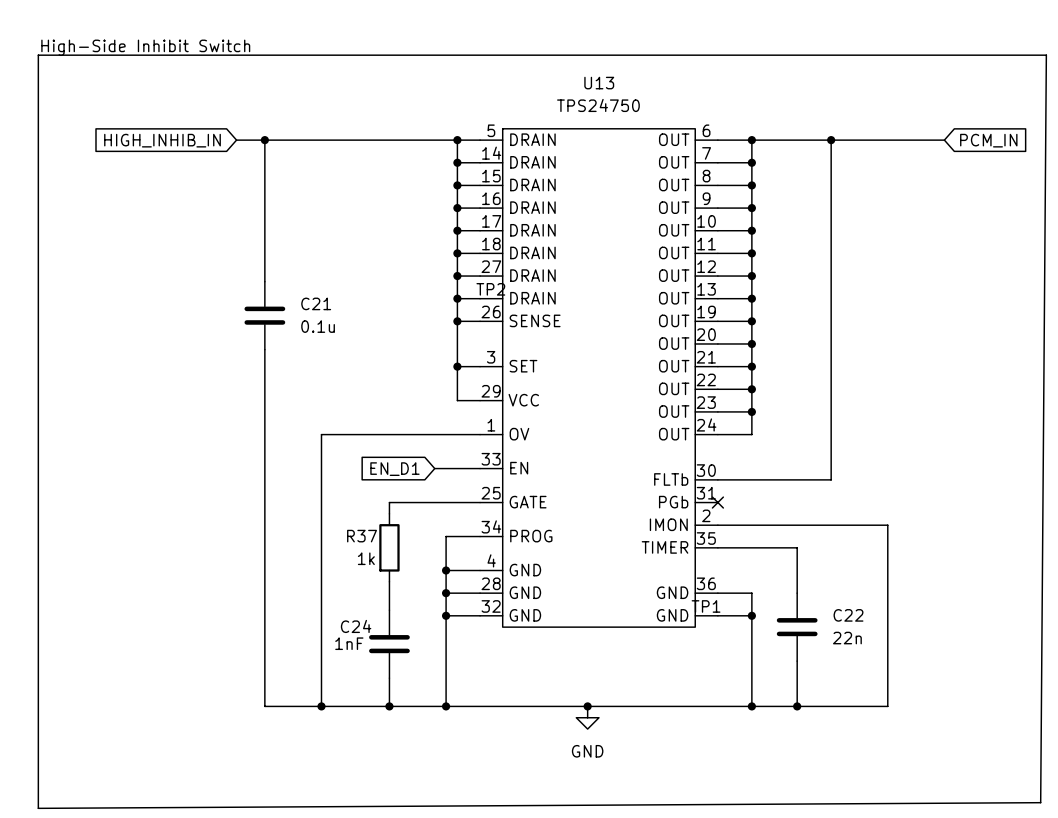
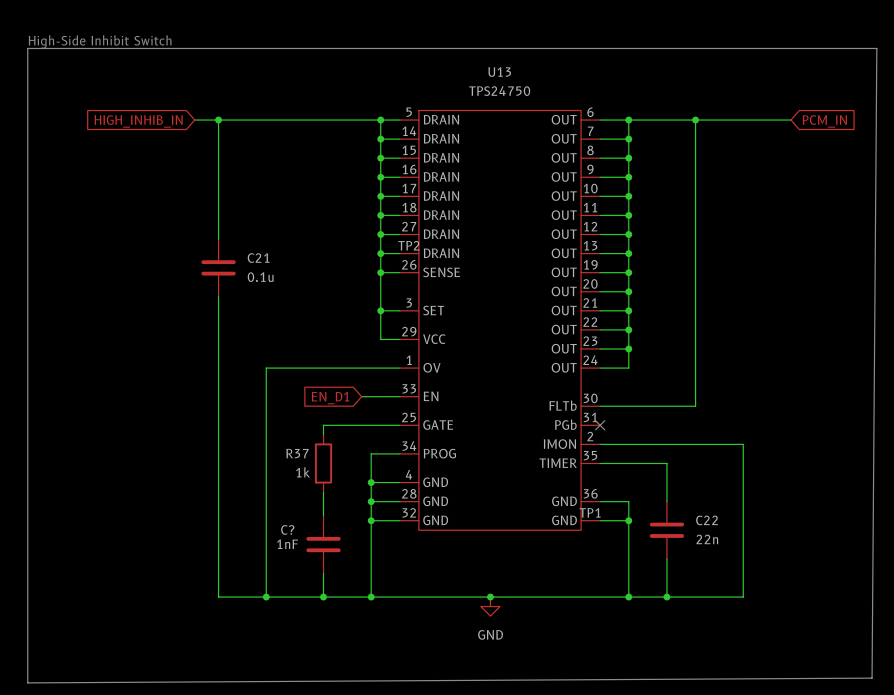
C24 name: C24 (356, 626) -> C? (287, 529)

